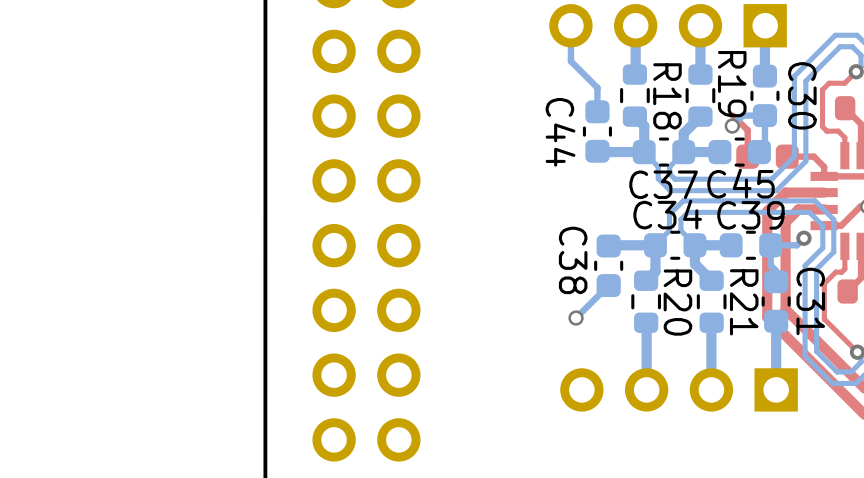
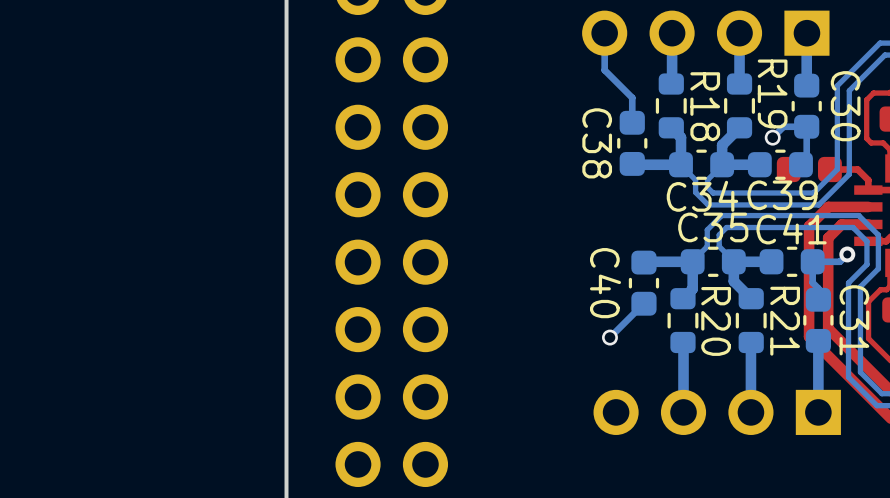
top track: (733, 115) (747, 130) (747, 156) -> none
C44 name: C44 (560, 132) -> C38 (597, 143)
C45 name: C45 (740, 183) -> C39 (782, 195)
C37 name: C37 (663, 184) -> C34 (702, 196)
C34 name: C34 (667, 214) -> C35 (713, 227)
C39 name: C39 (750, 215) -> C41 (791, 228)
C38 name: C38 (573, 260) -> C40 (605, 283)

